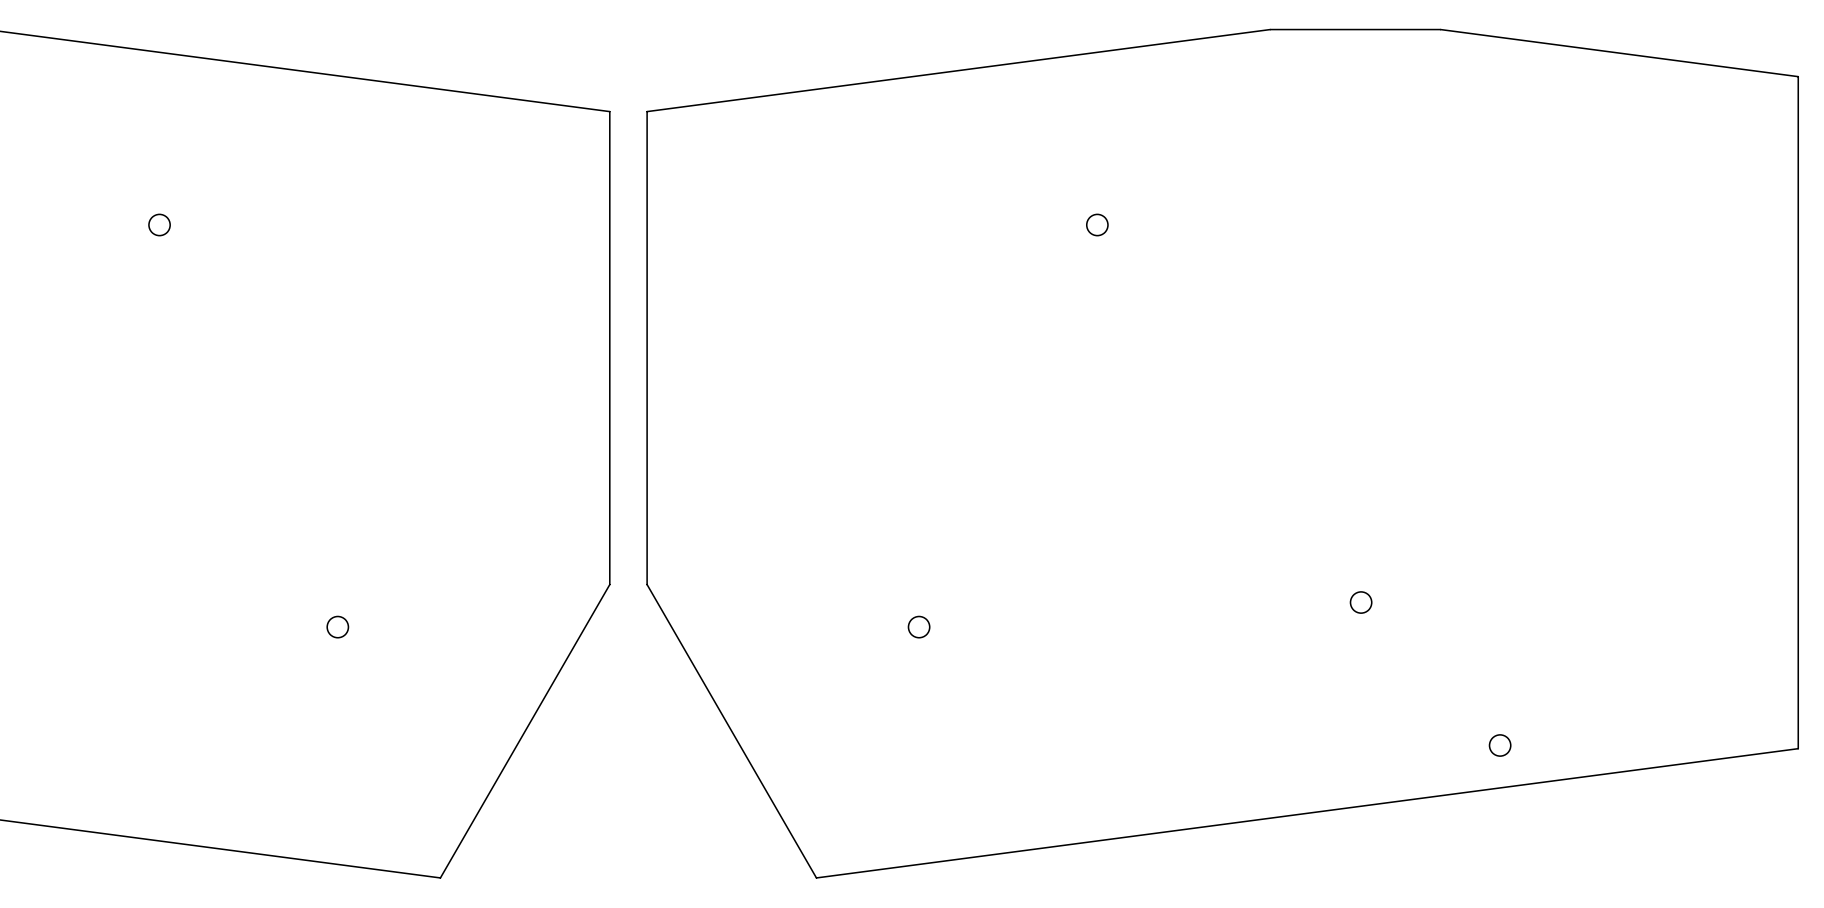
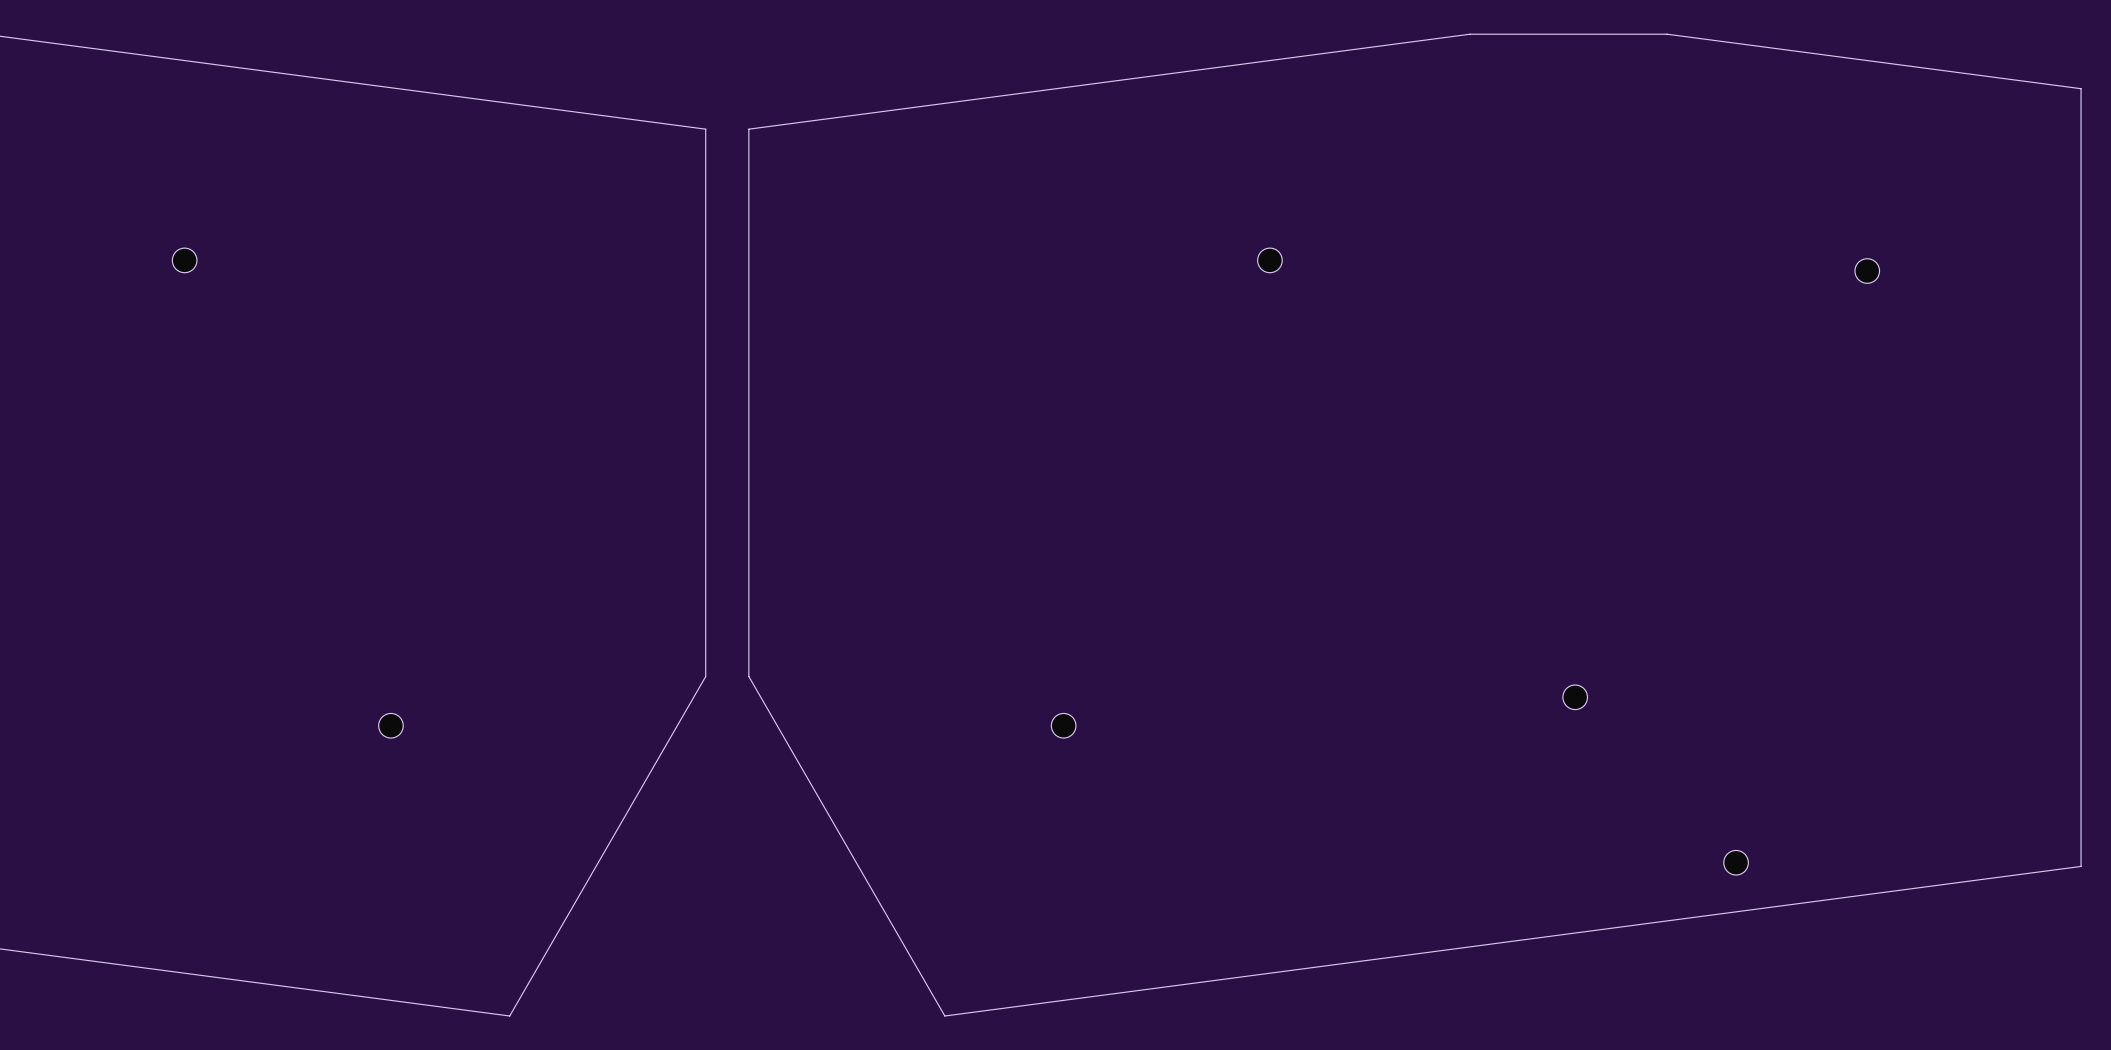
part: none -> (1867, 271)

